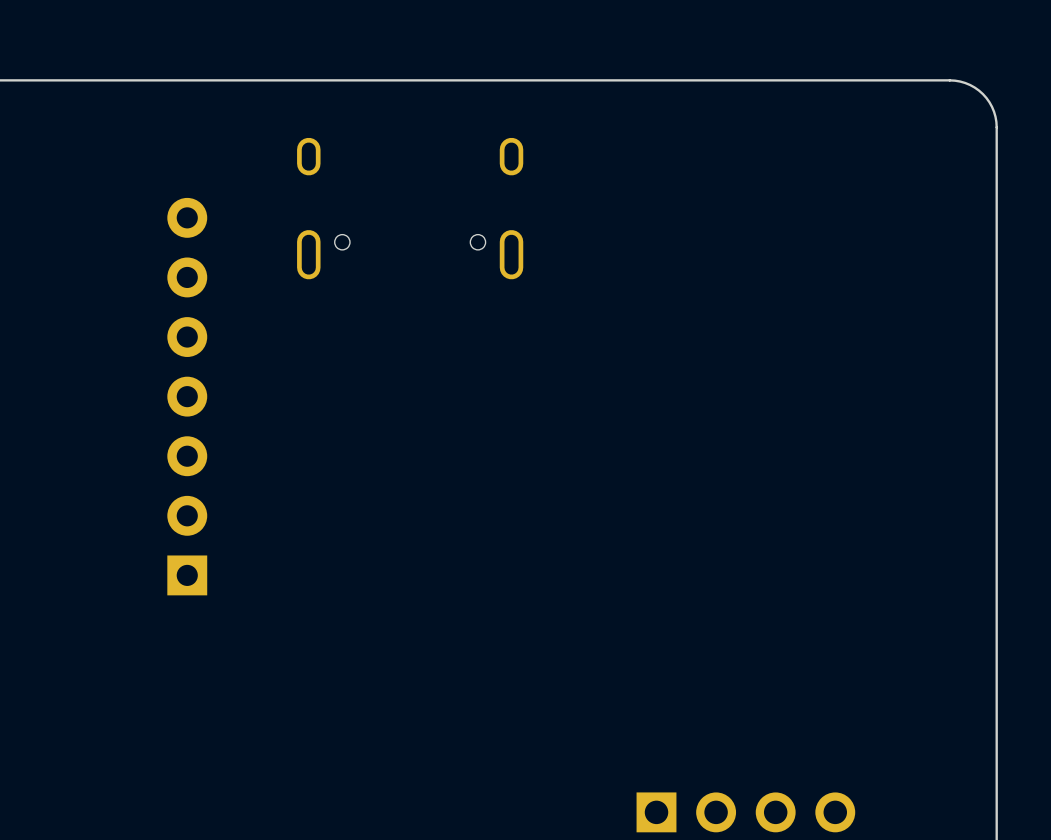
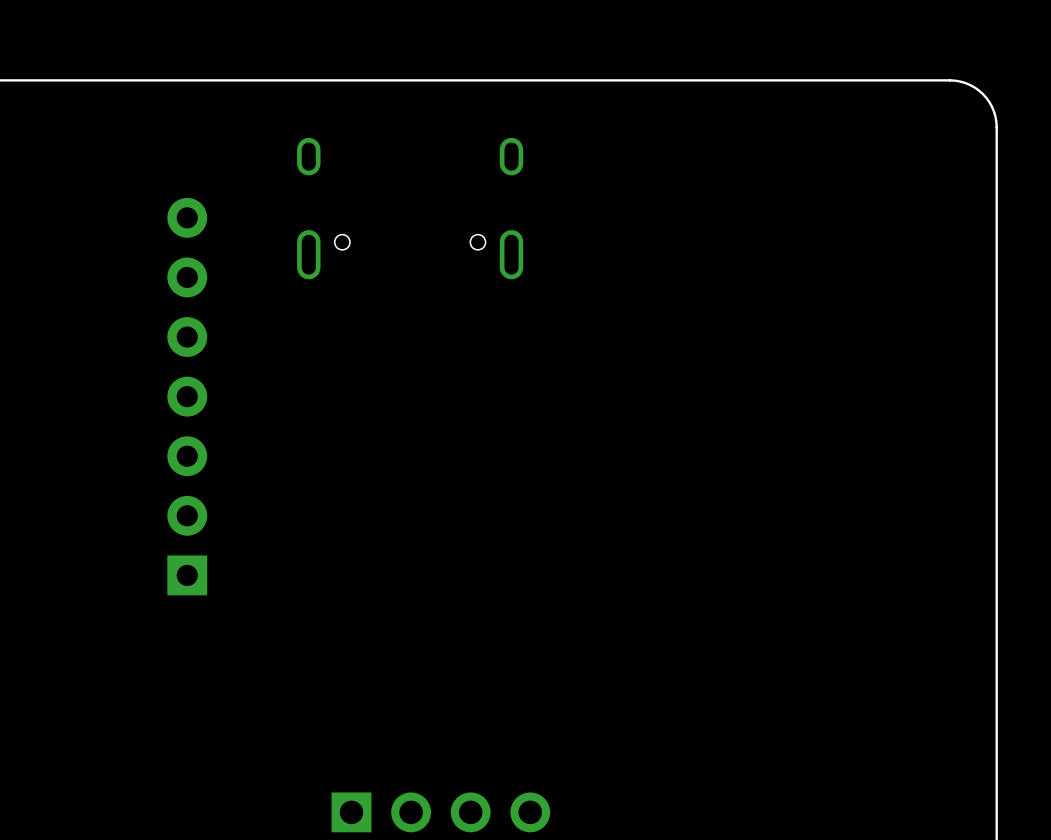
part position: (745, 812) -> (440, 812)

